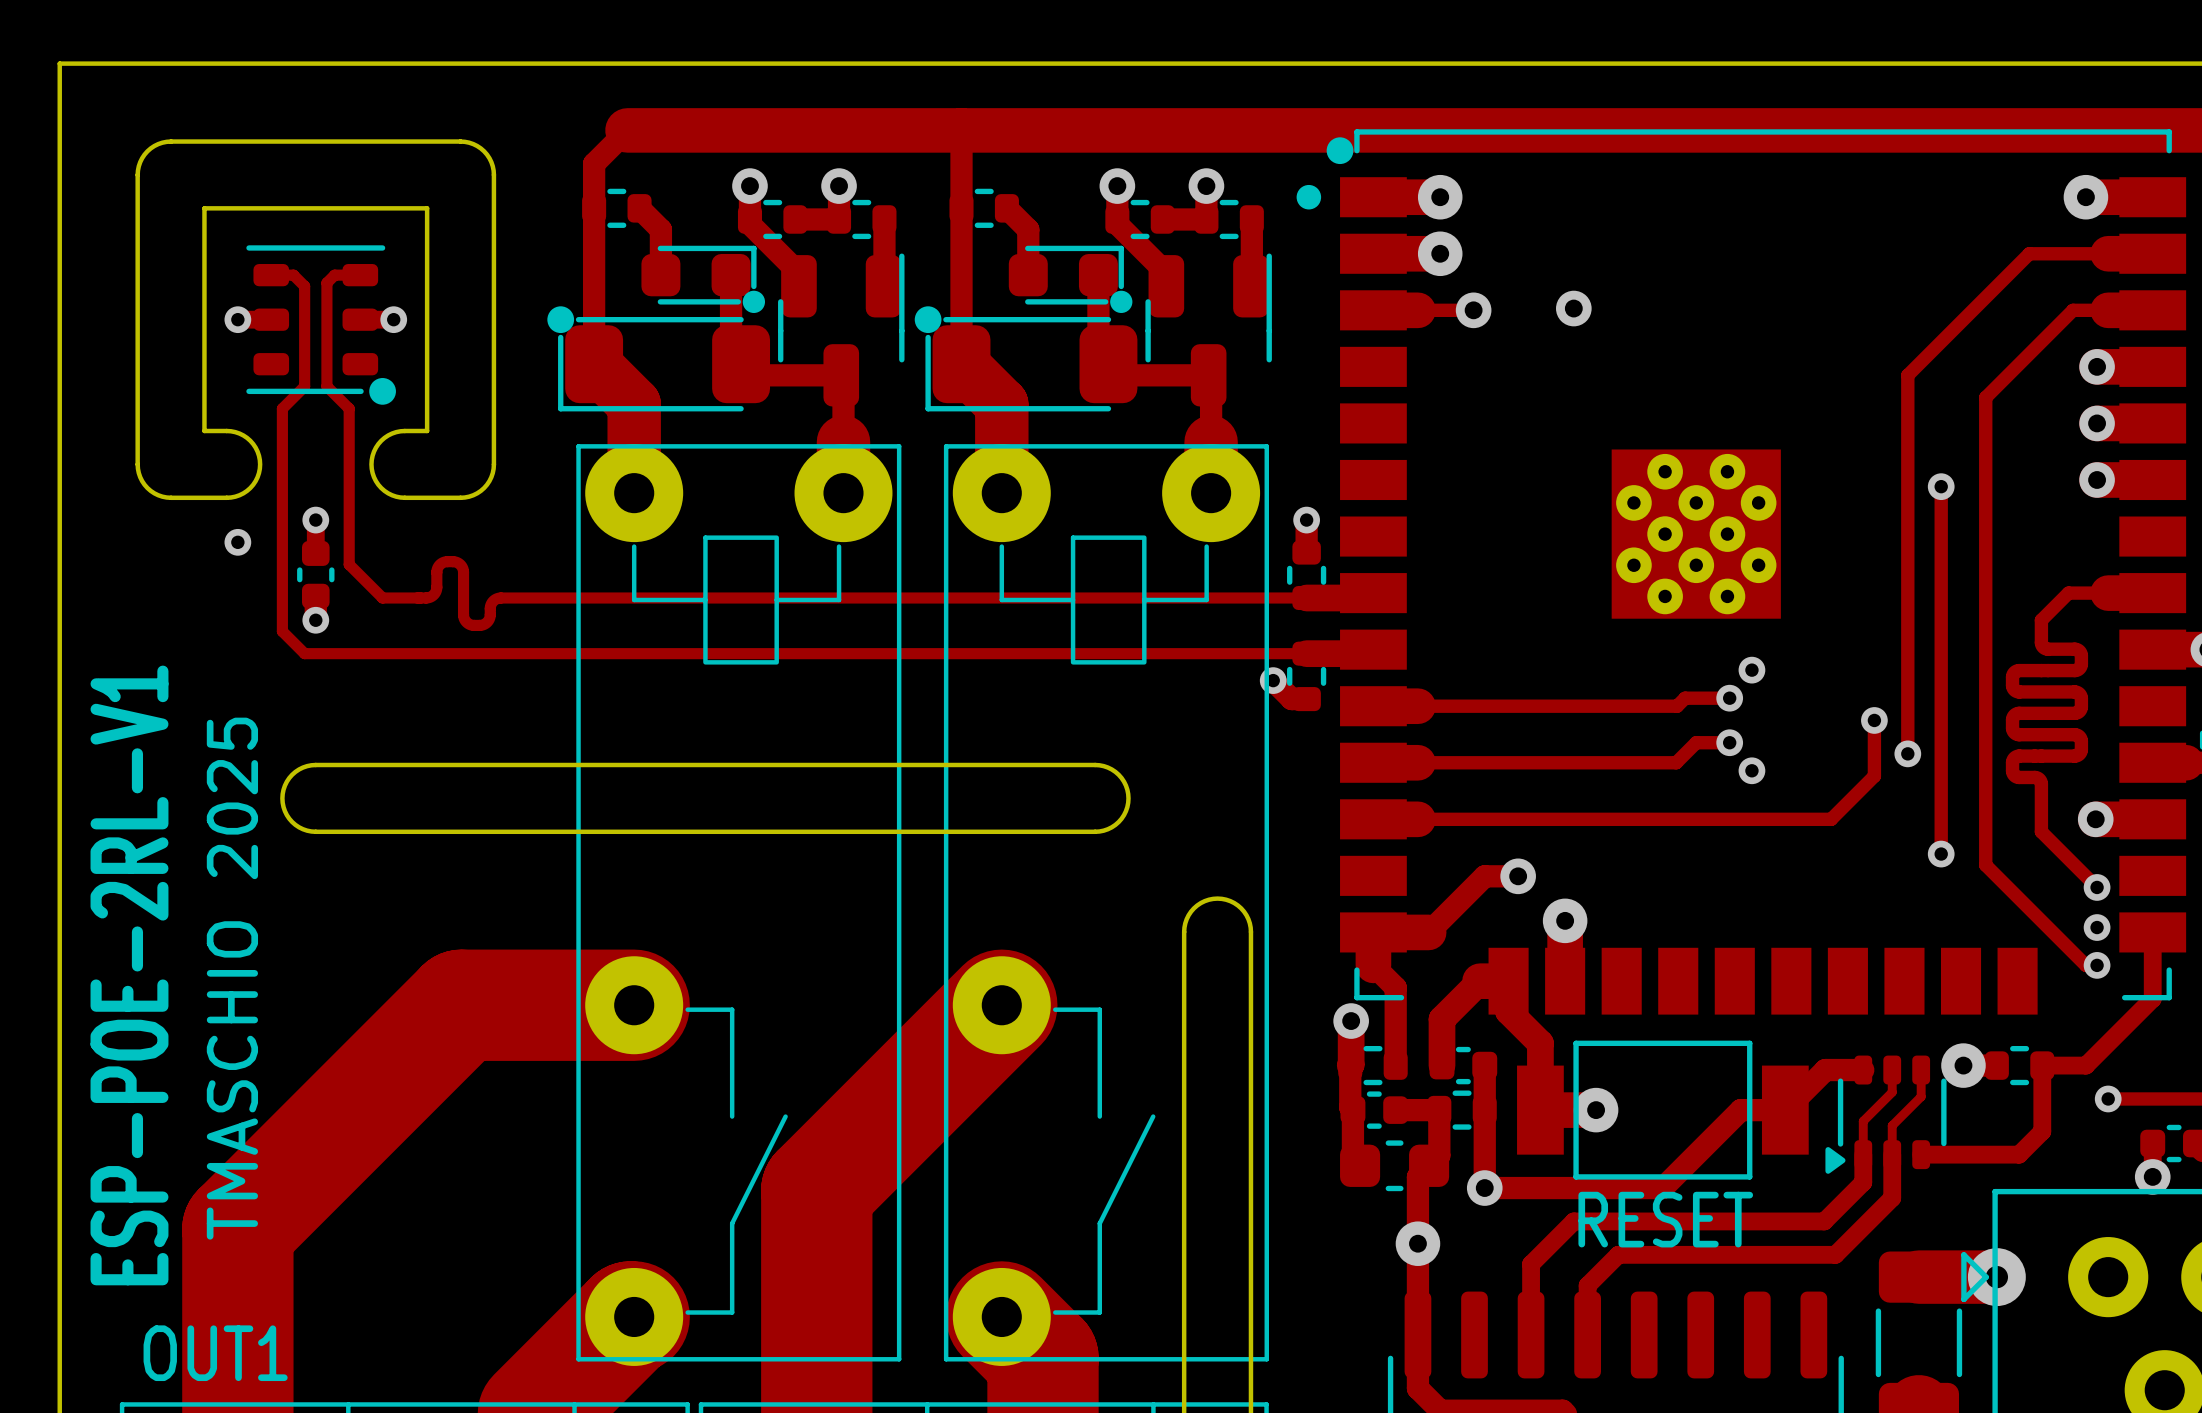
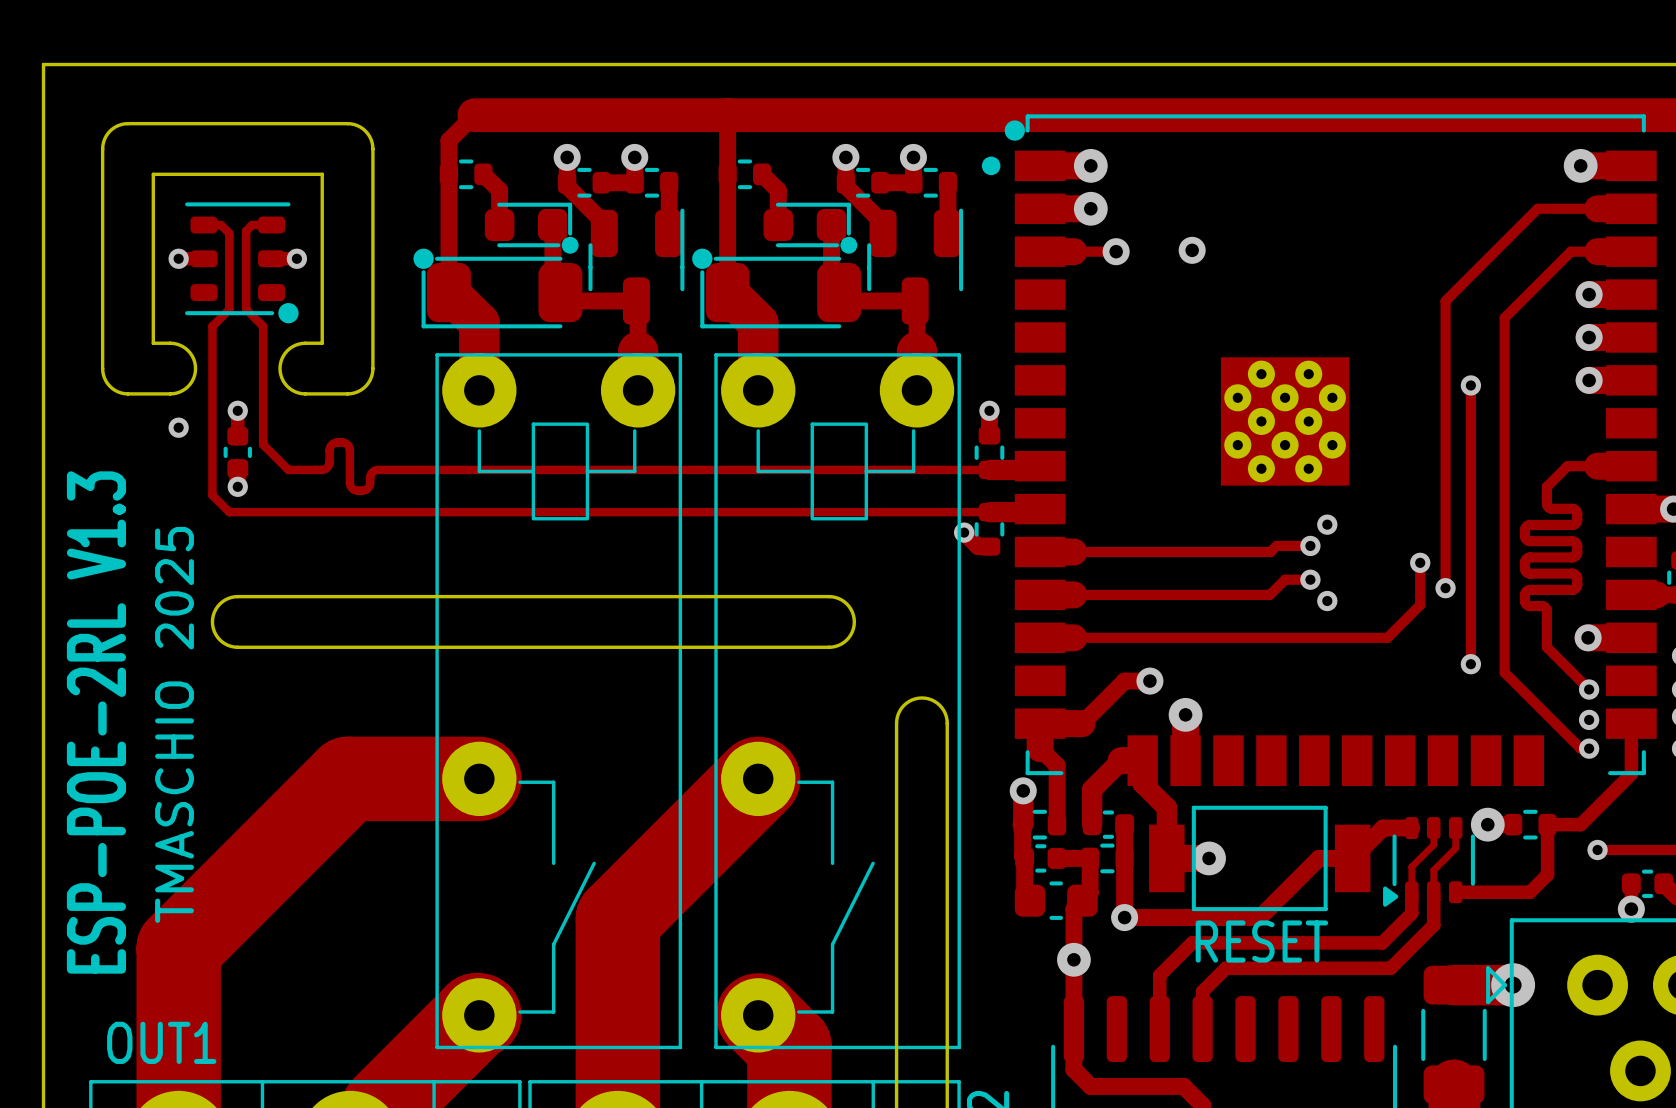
text: ESP-POE-2RL-V1 (129, 975) -> ESP-POE-2RL V1.3 (96, 722)
text position: TMASCHIO 2025 (232, 978) -> TMASCHIO 2025 (174, 724)

